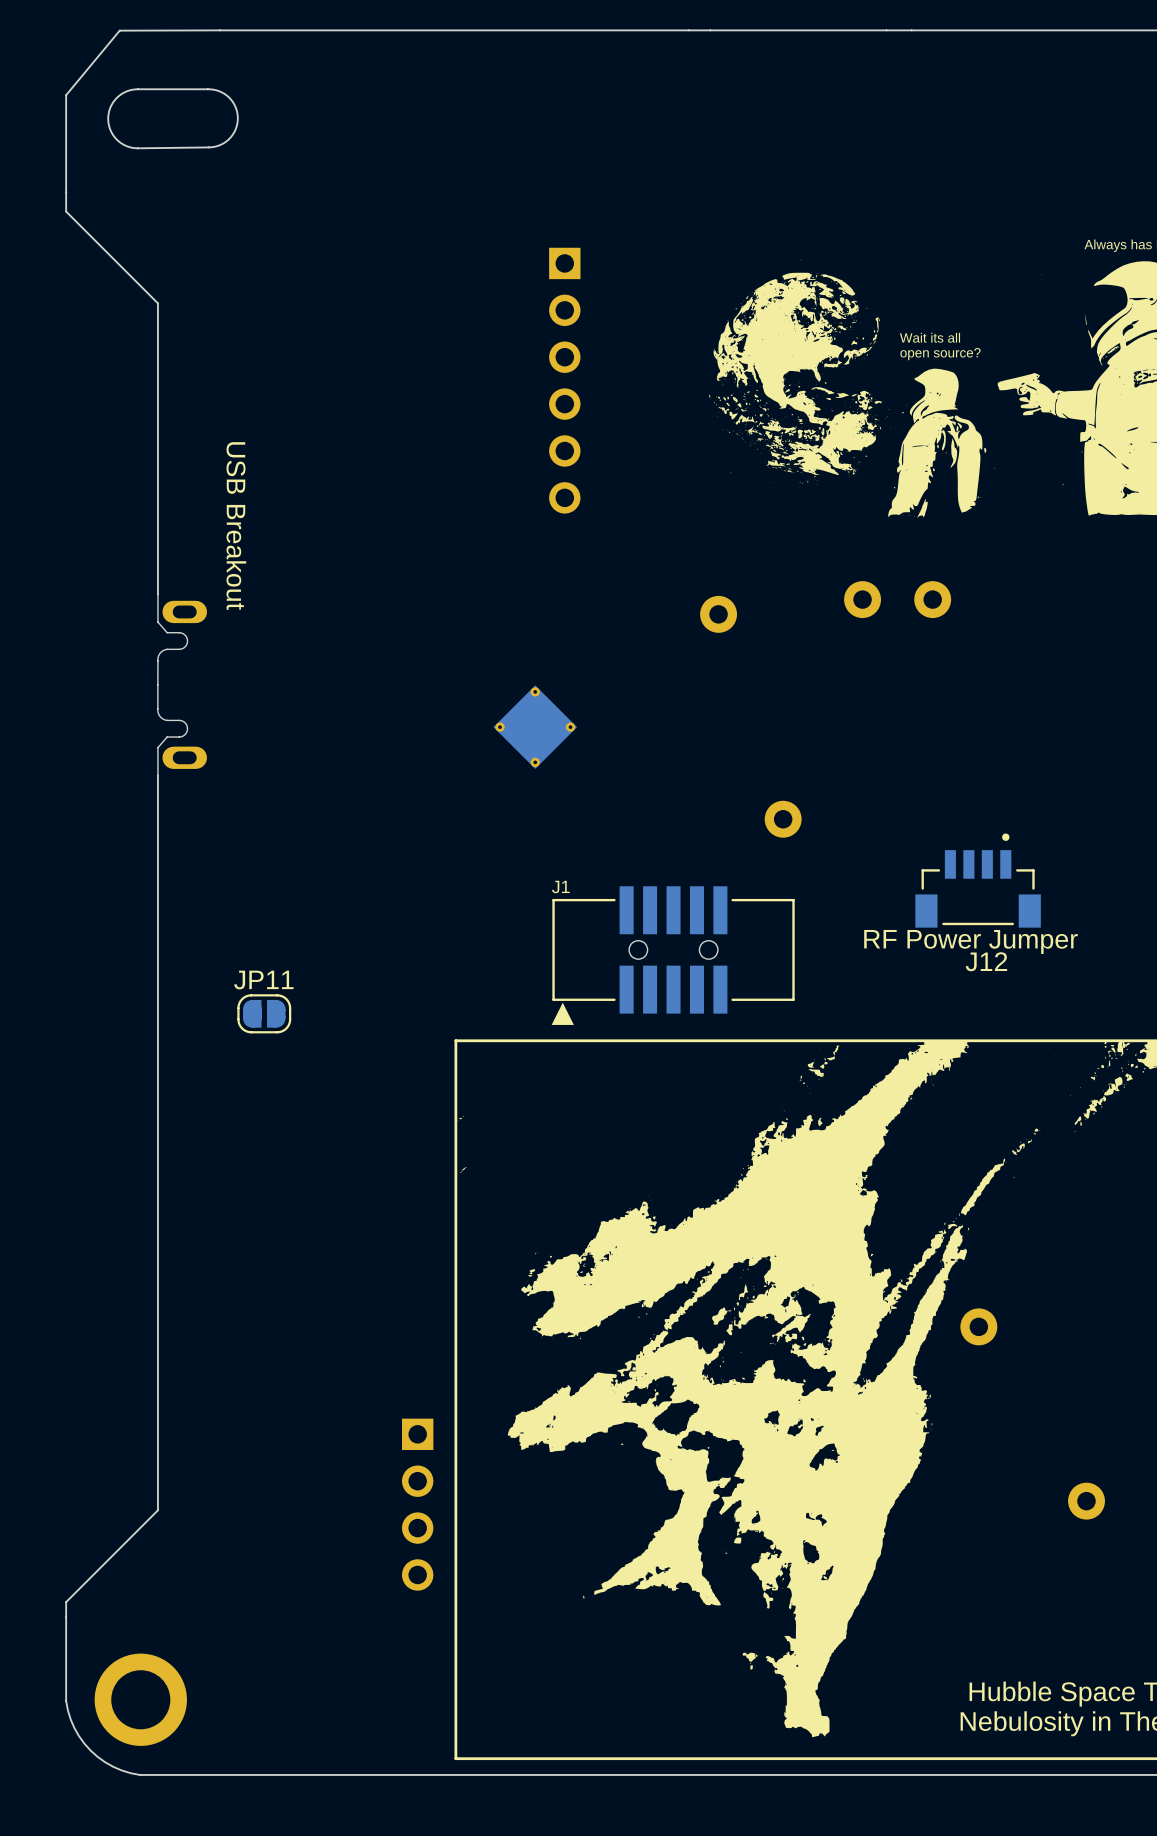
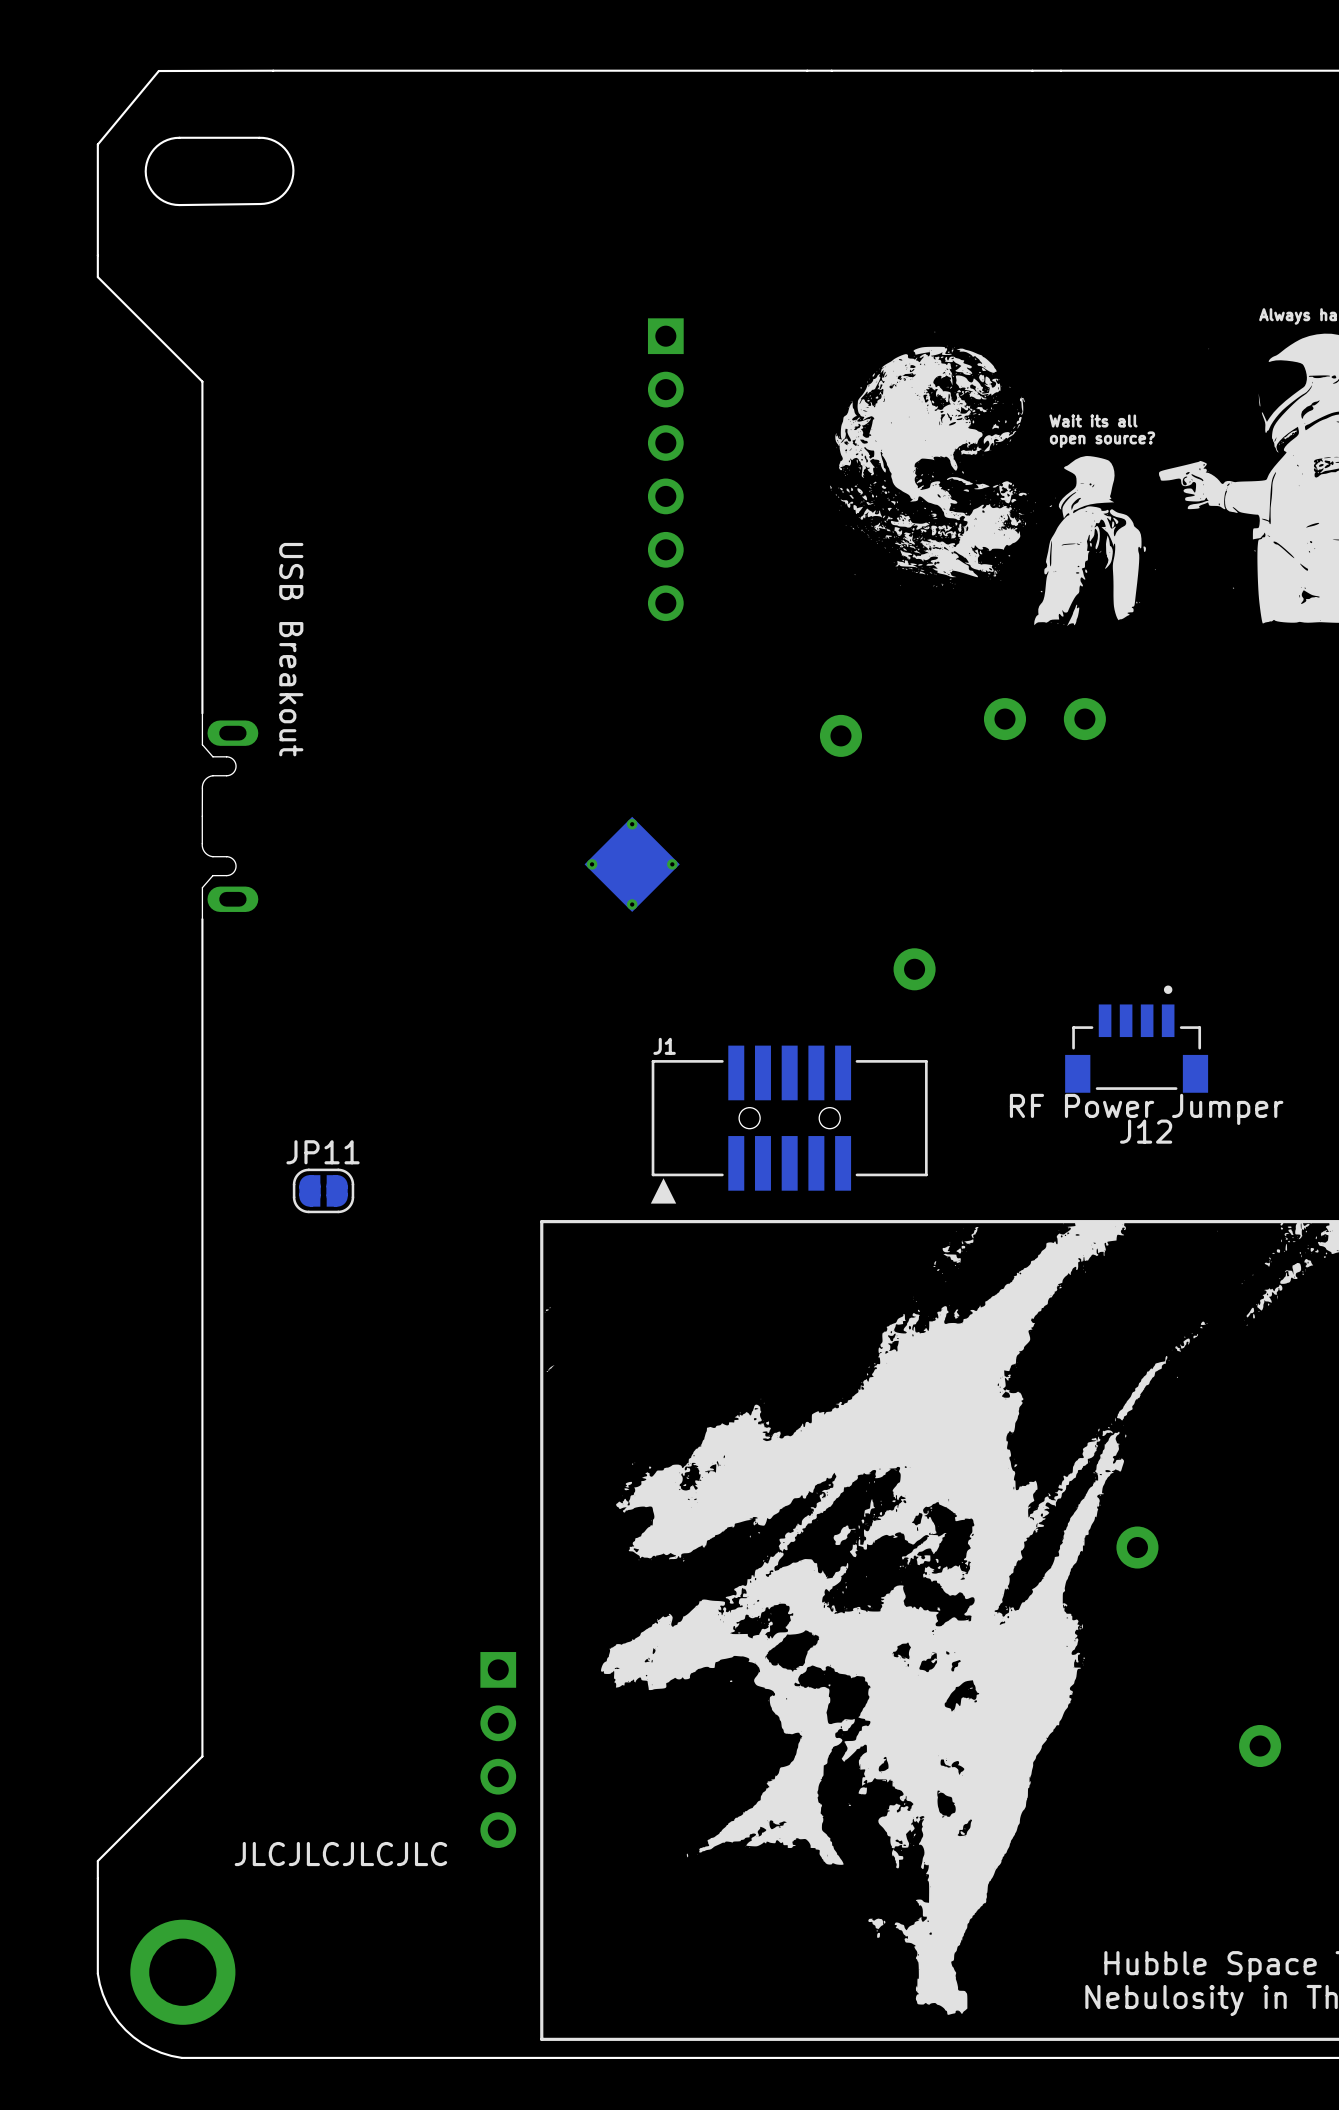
text: none -> JLCJLCJLCJLC (340, 1854)

